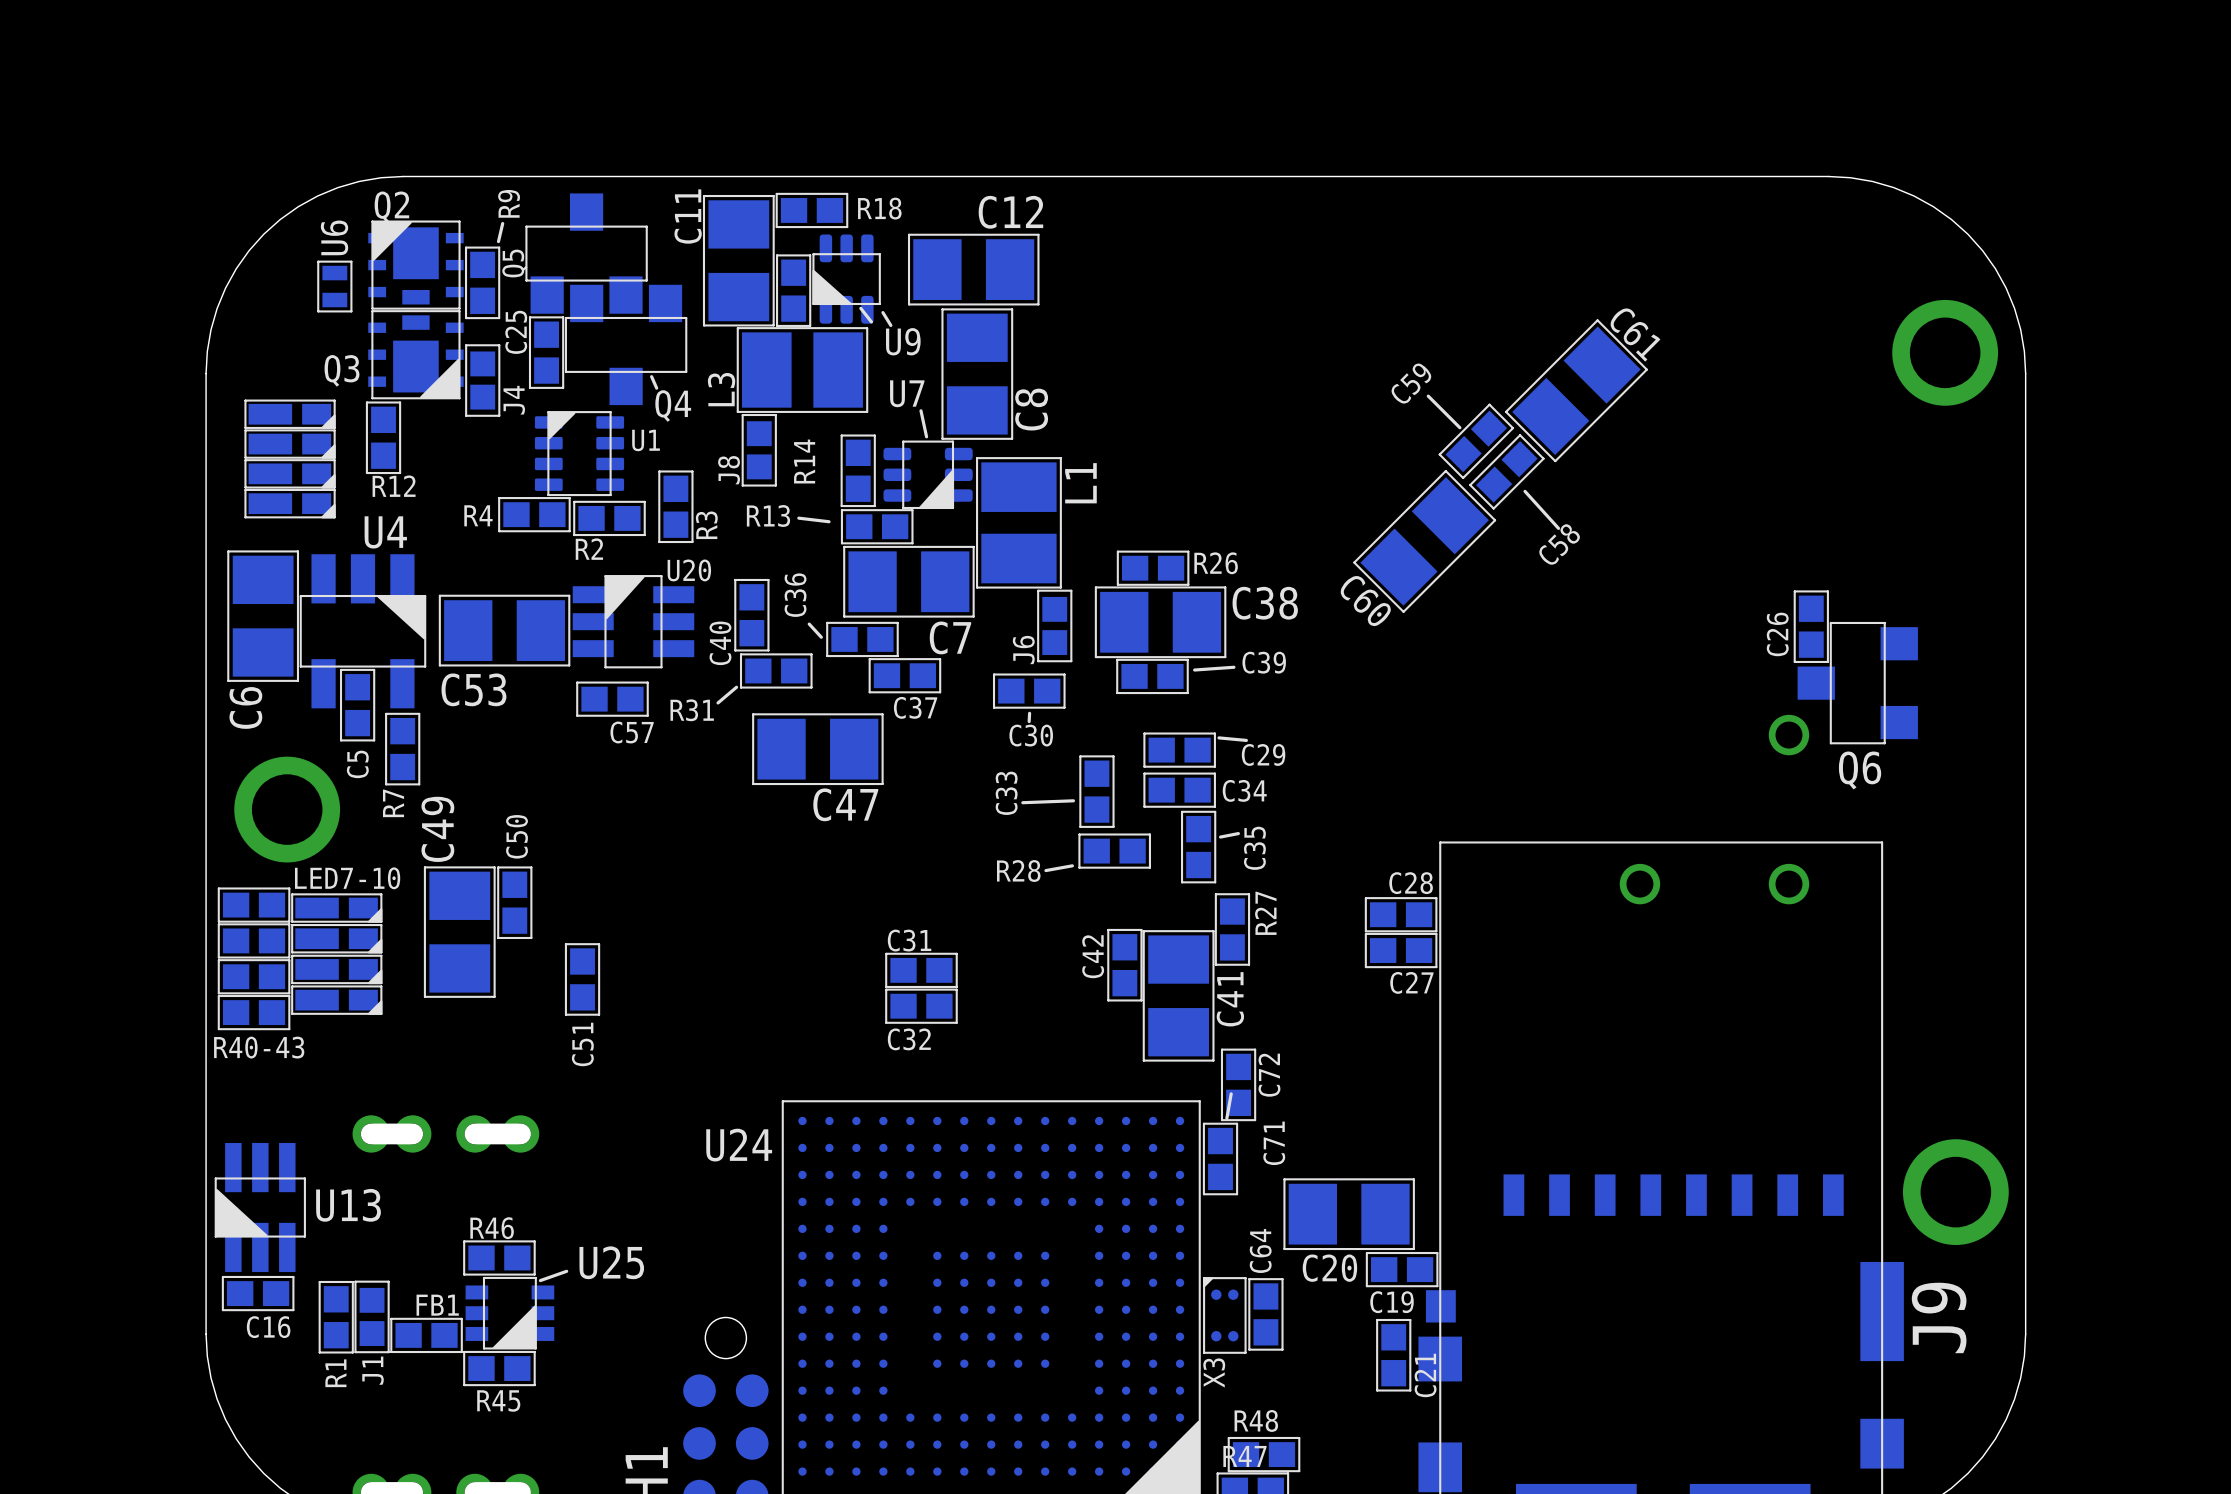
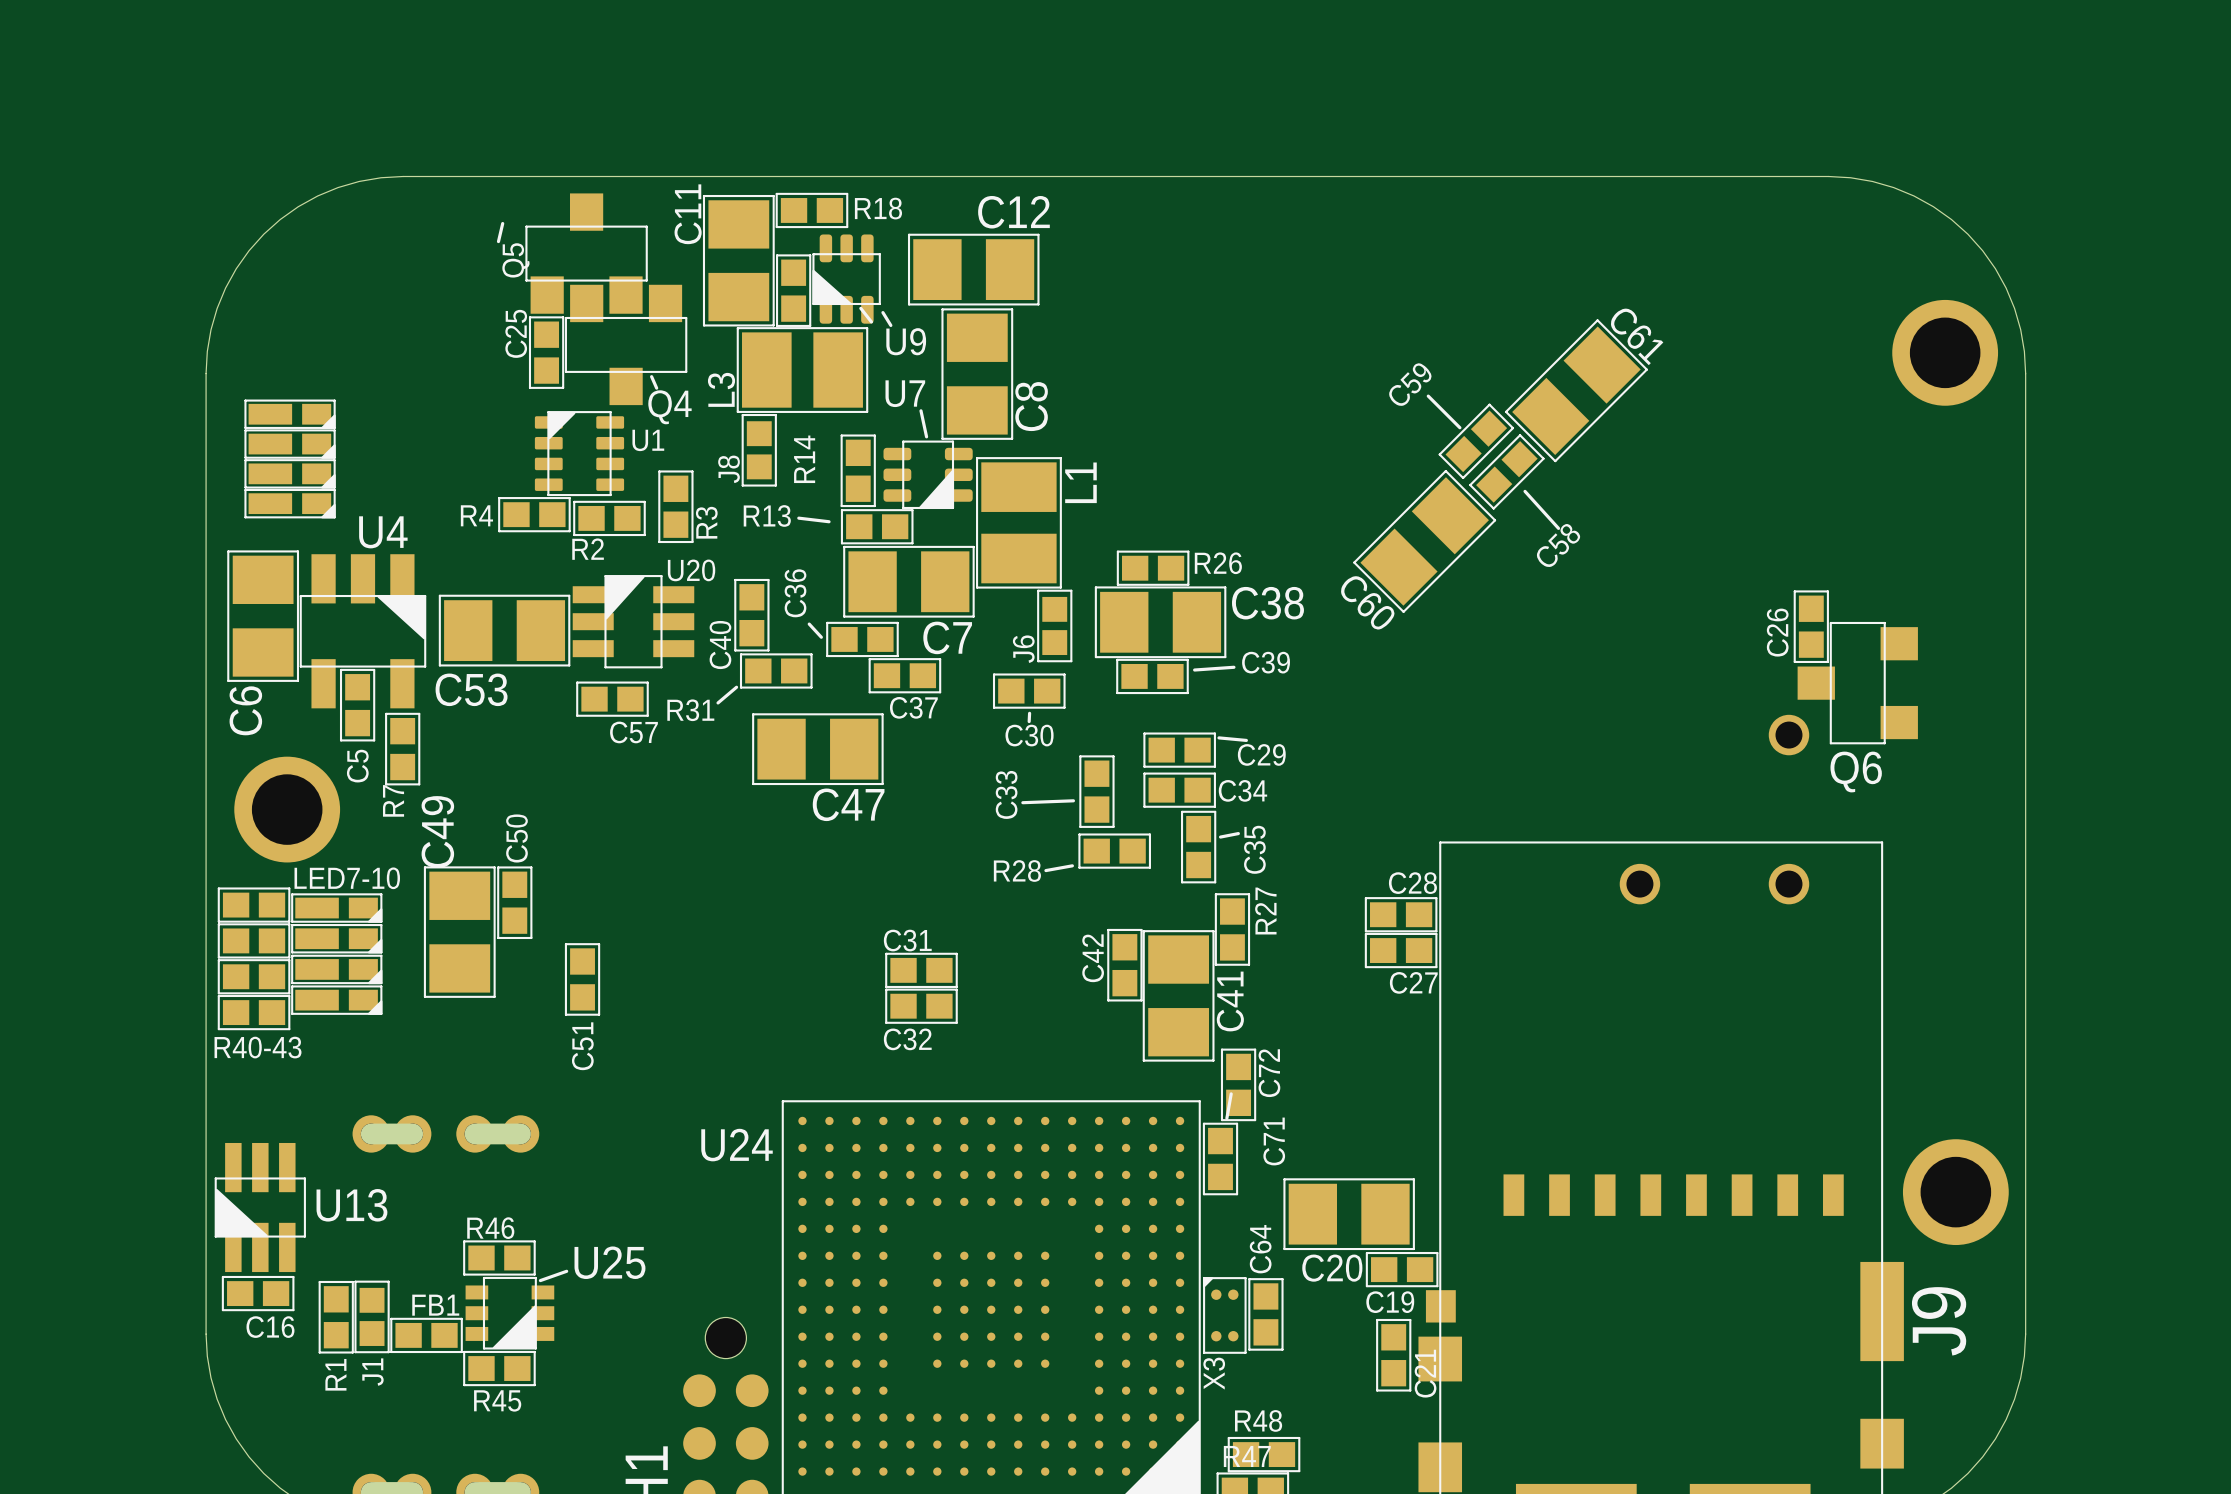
Q2: (415, 265) -> none
R9: (482, 282) -> none
U6: (334, 286) -> none
Q3: (415, 354) -> none
J4: (482, 380) -> none
R12: (383, 437) -> none

